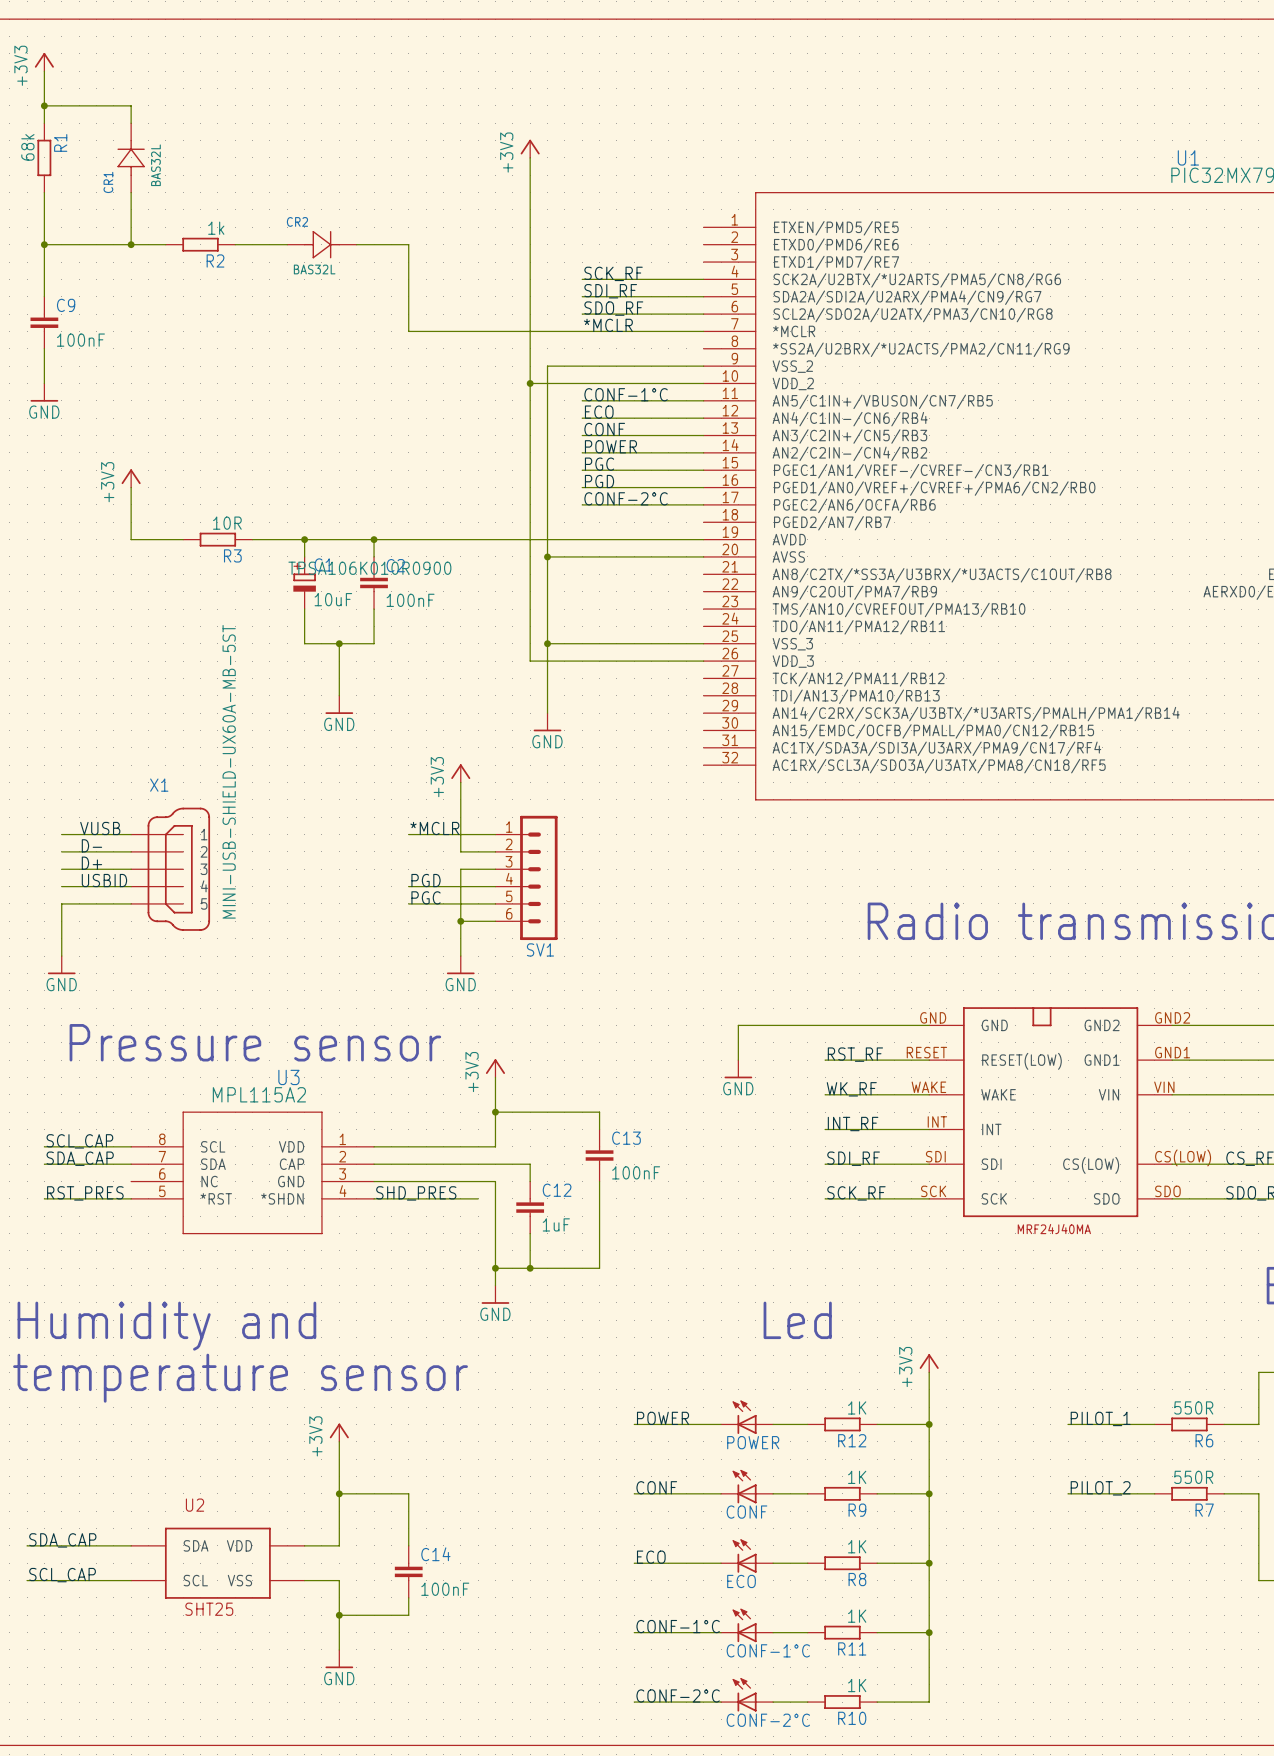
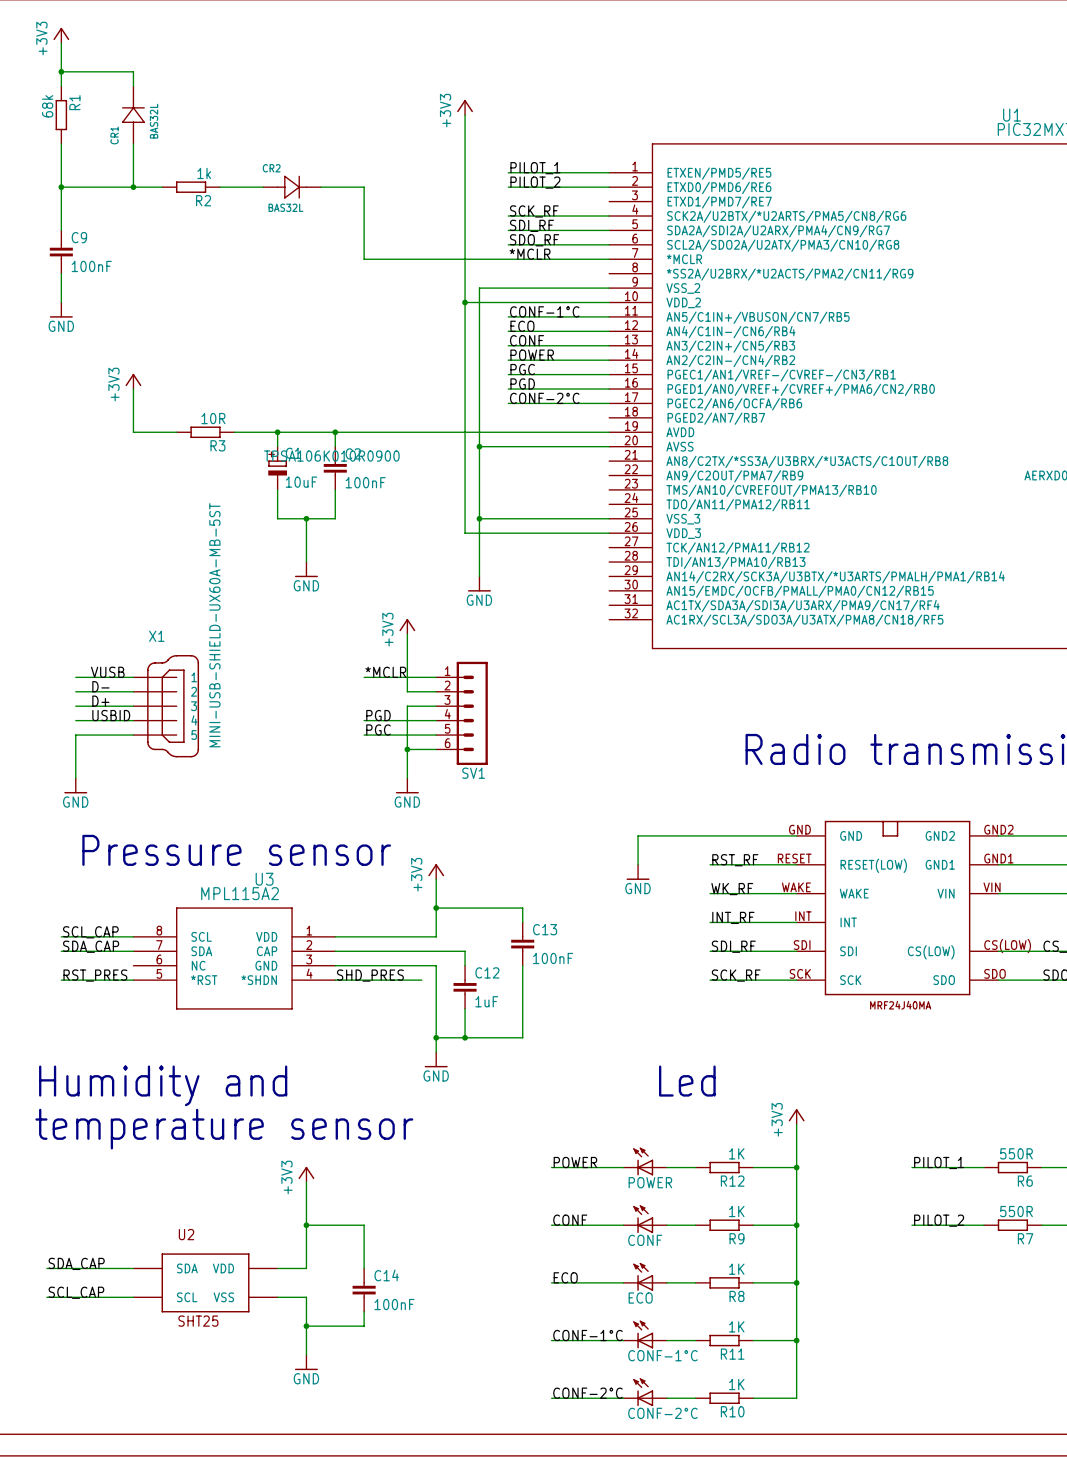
label: none -> PILOT_1 (535, 168)
wire: none -> (508, 172) (609, 172)
label: none -> PILOT_2 (535, 182)
wire: none -> (508, 187) (609, 187)

